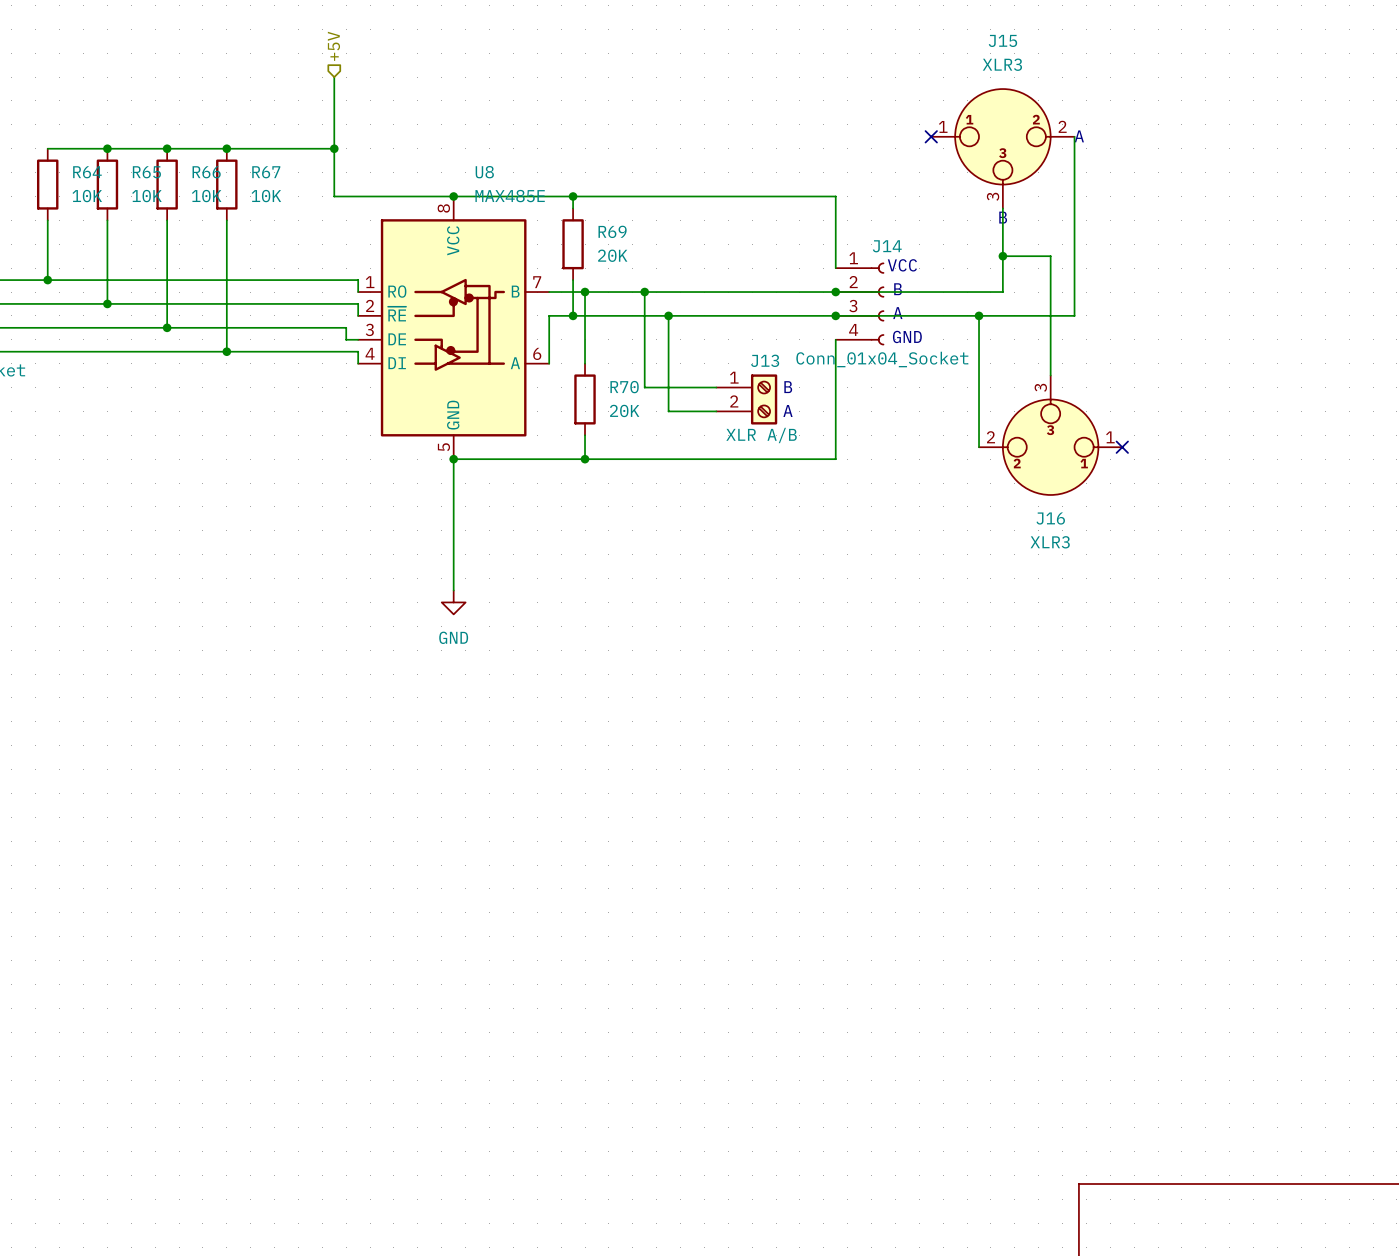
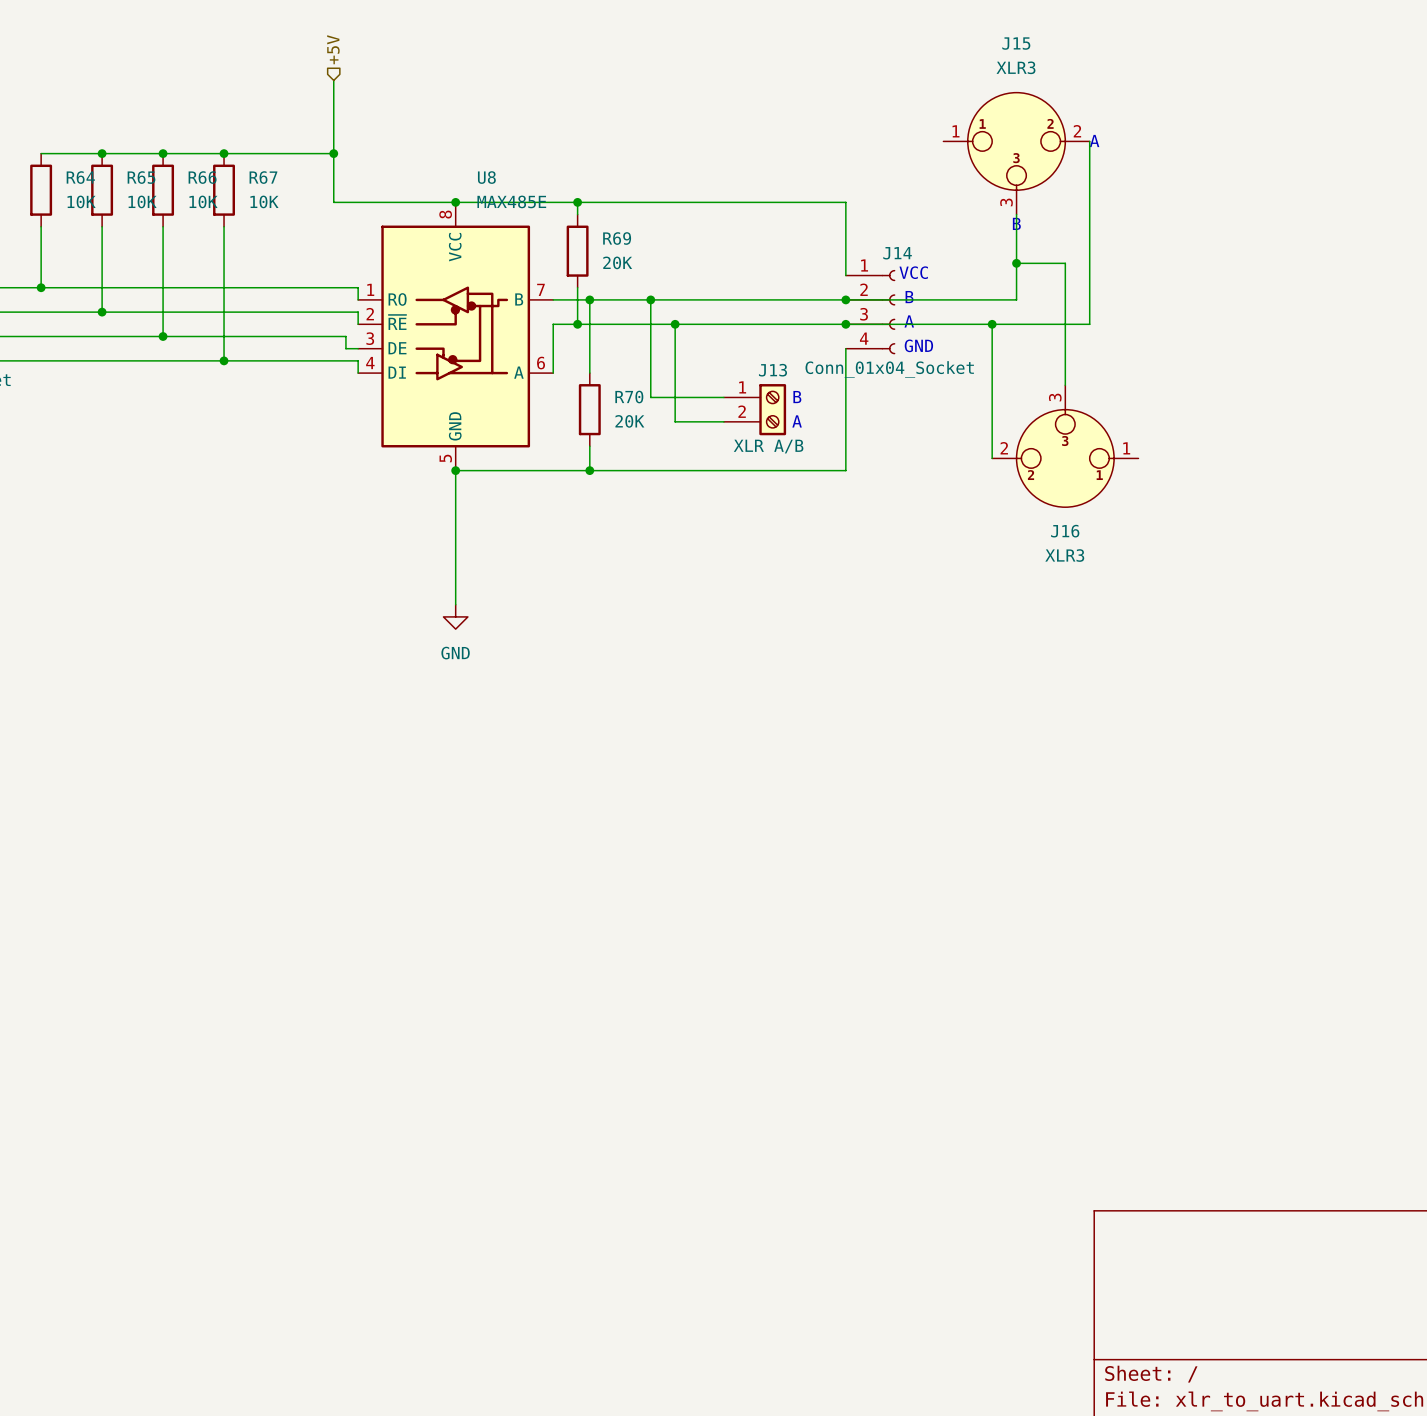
no-connect mark: (931, 136) -> none
no-connect mark: (1122, 447) -> none

